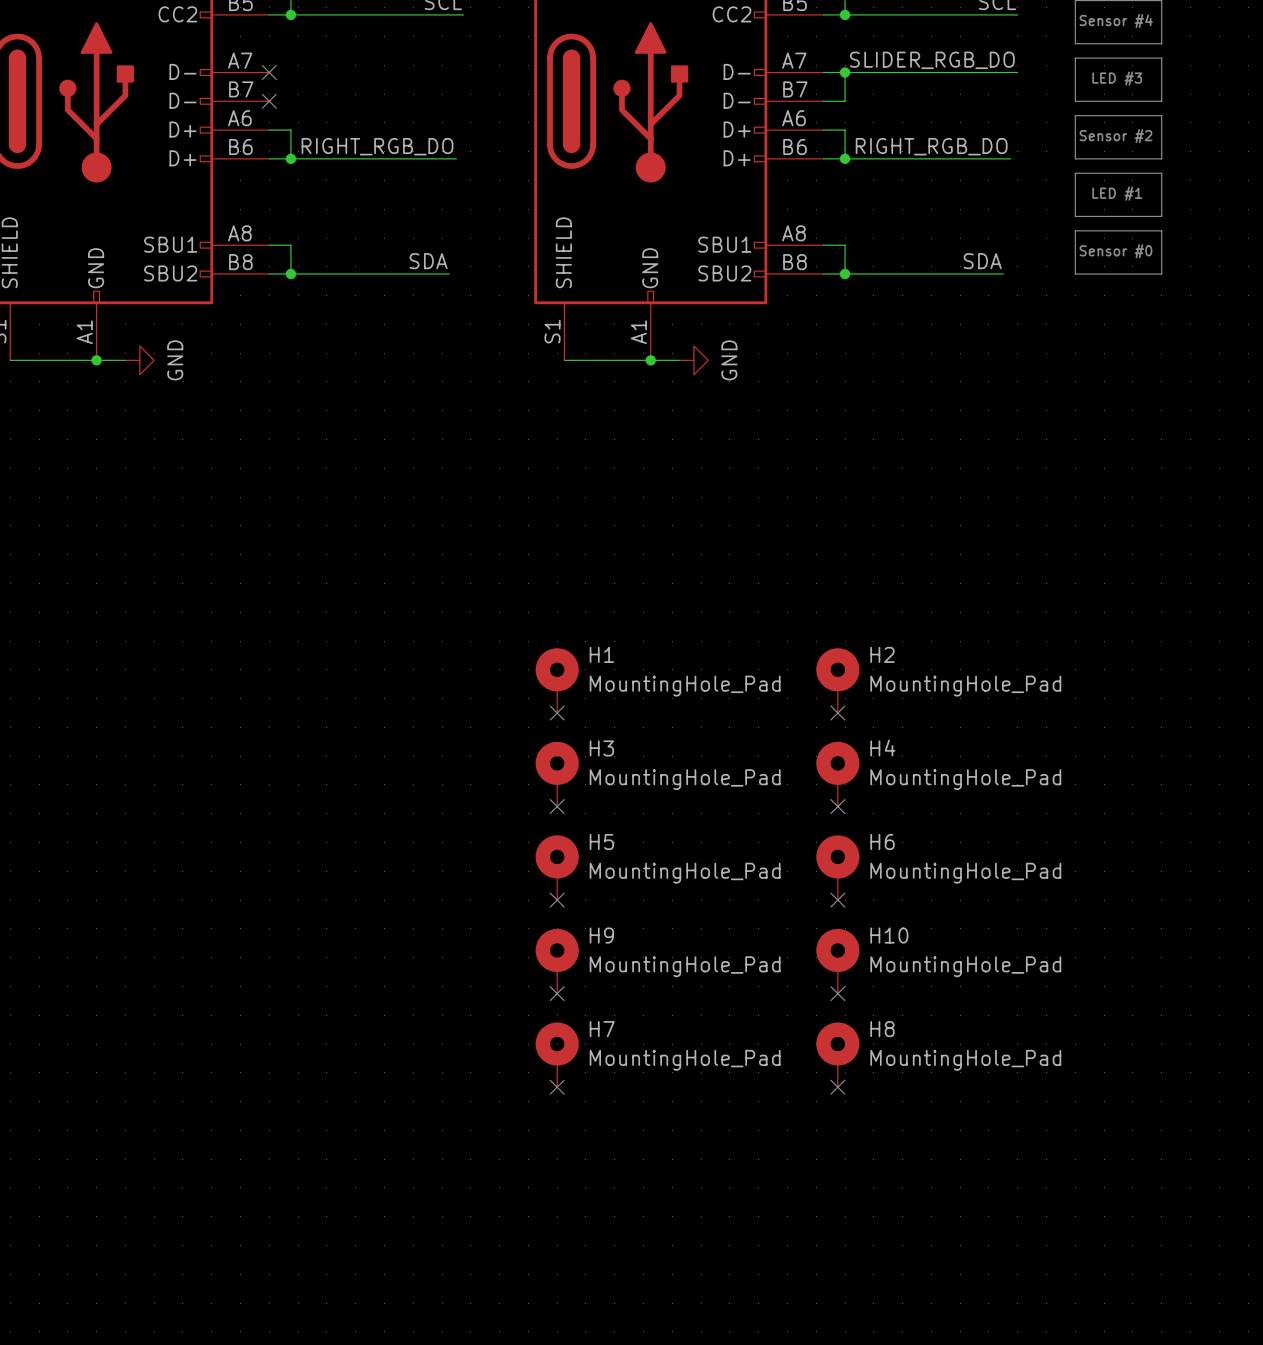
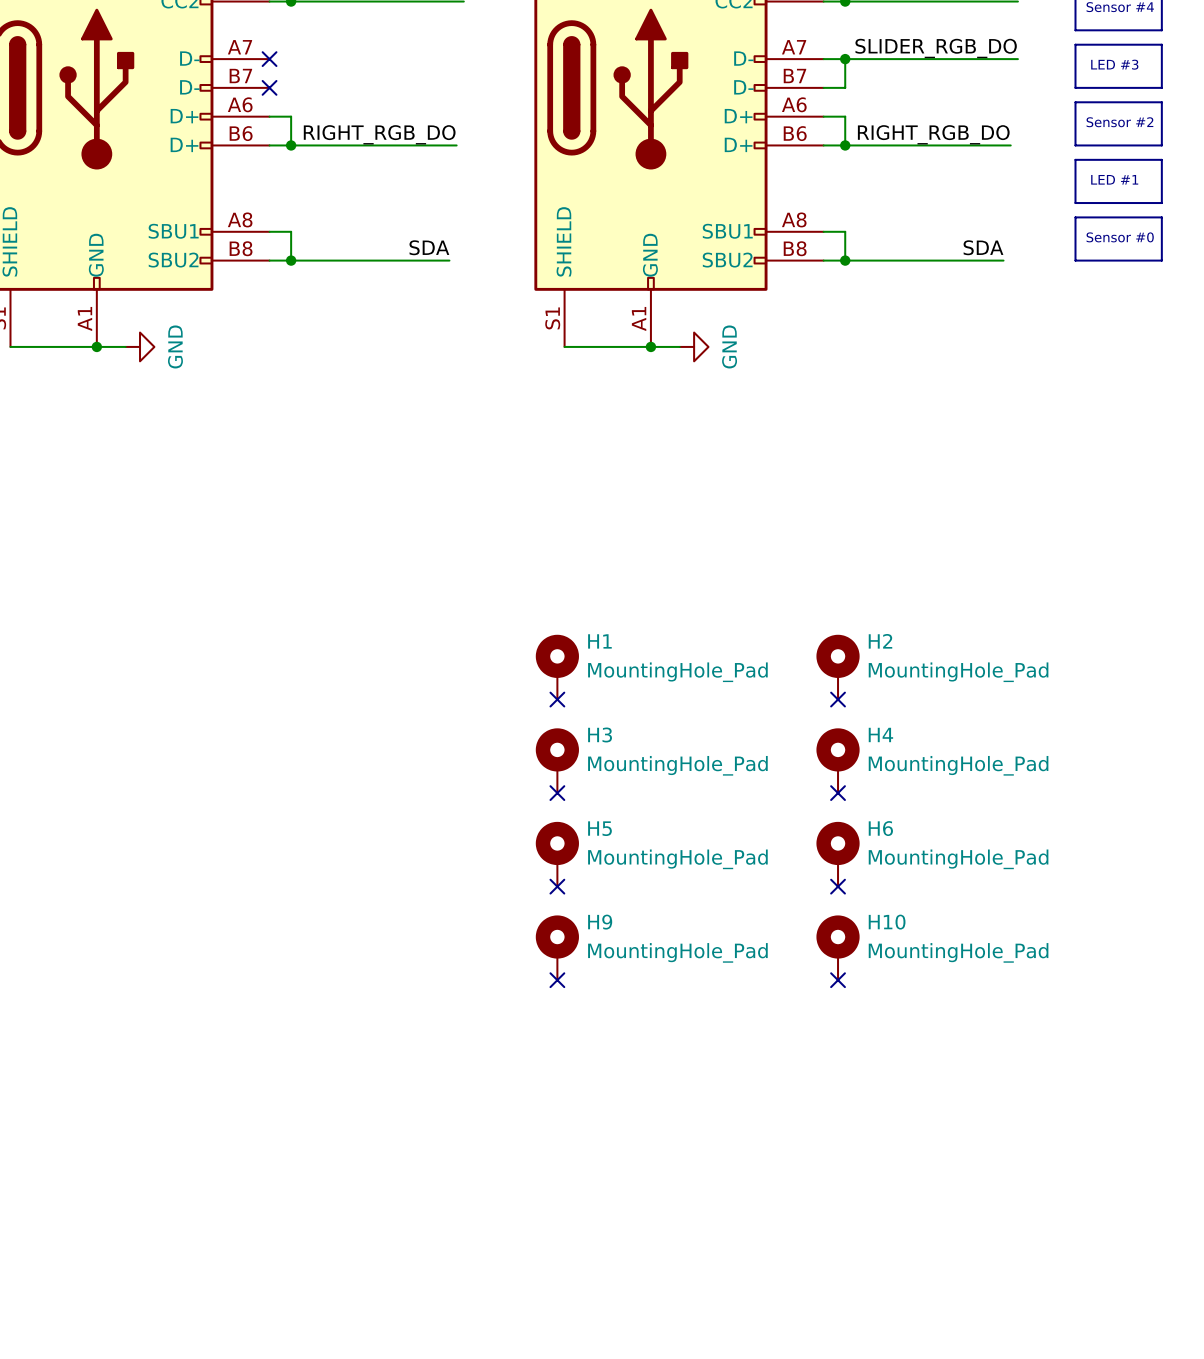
H7: MountingHole_Pad (557, 1054) -> none
H8: MountingHole_Pad (837, 1054) -> none
no-connect mark: (557, 1087) -> none
no-connect mark: (837, 1087) -> none

